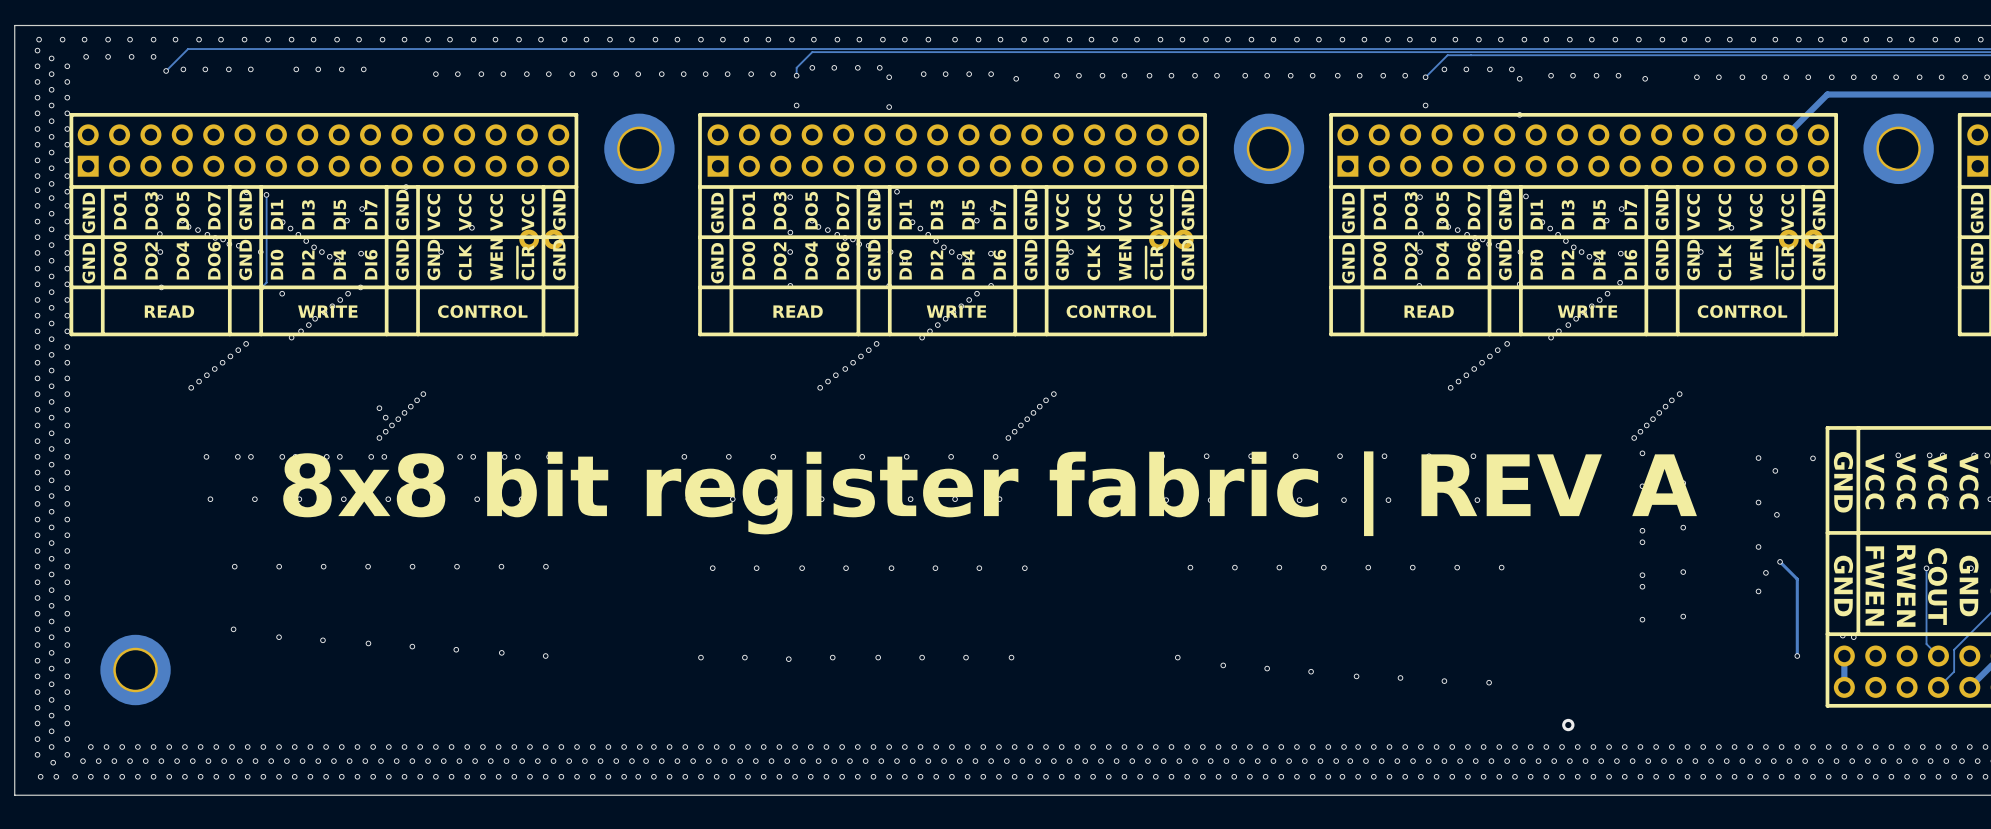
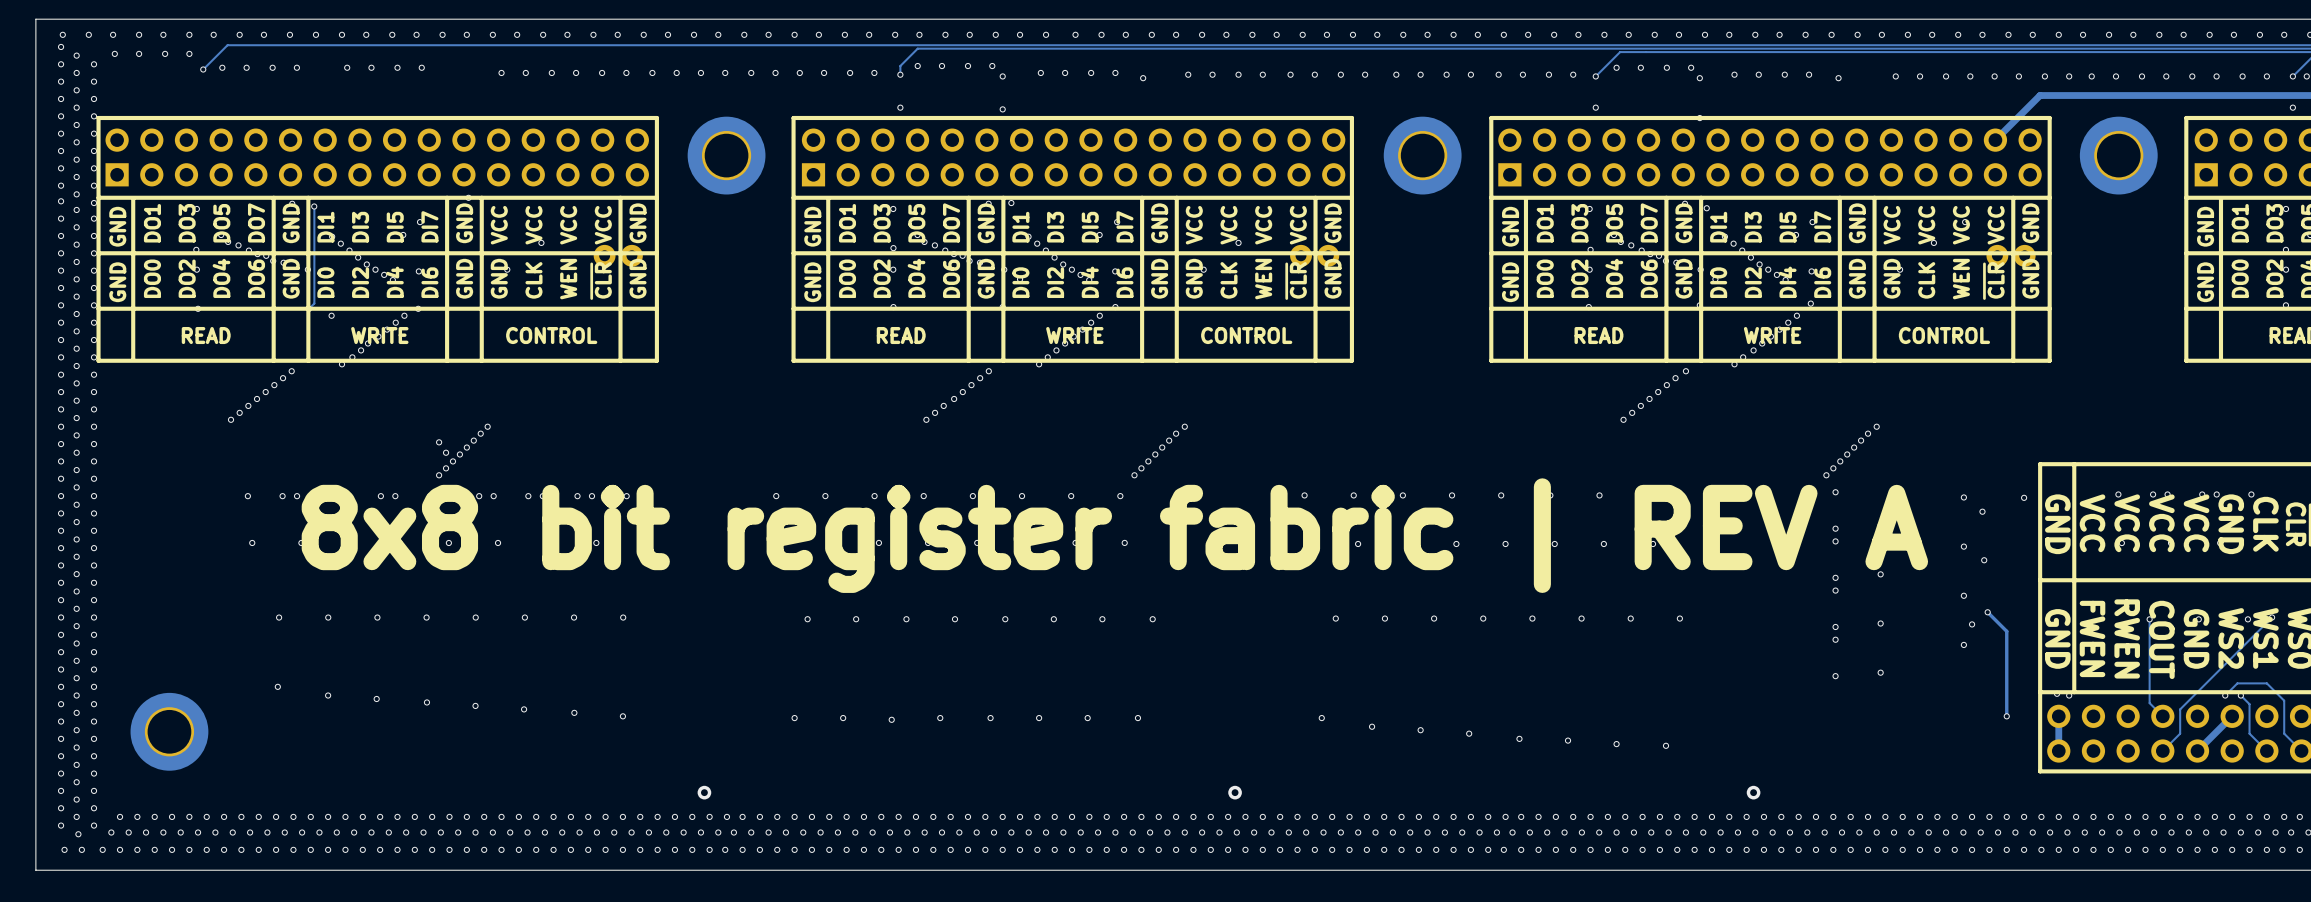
via: none -> (704, 792)
via: none -> (1235, 792)

